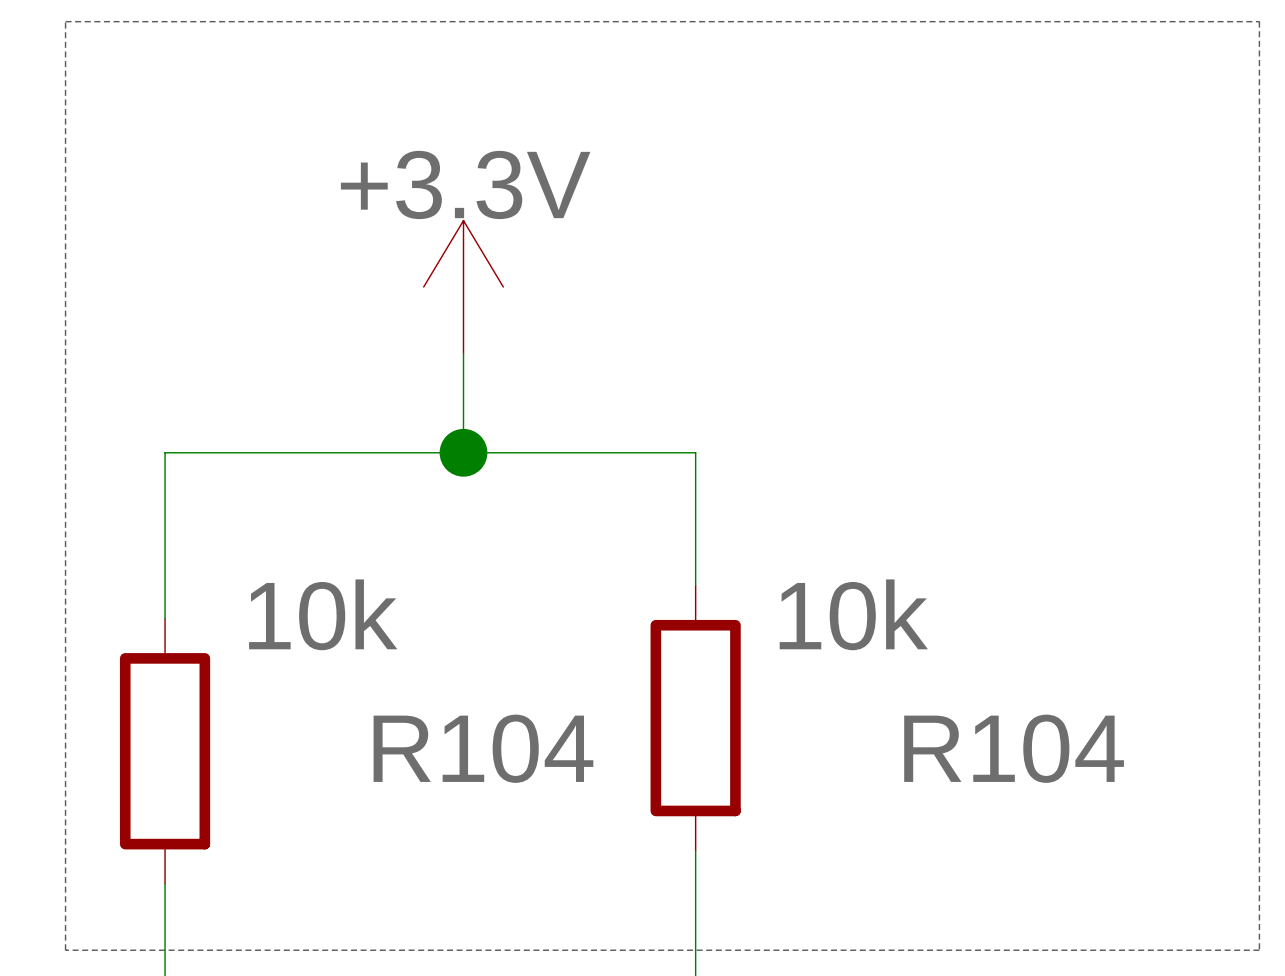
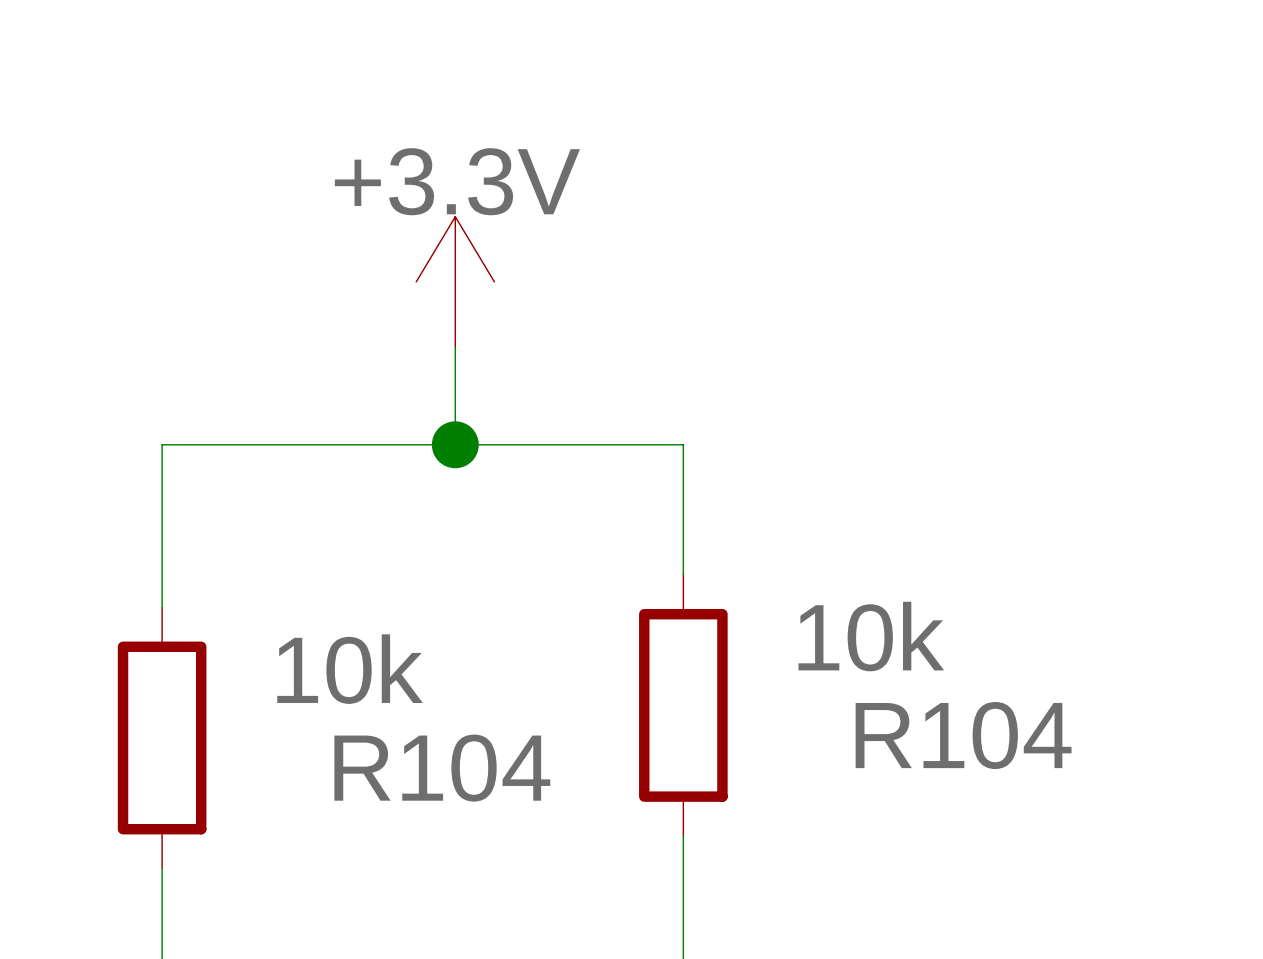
line: (65, 21) (1259, 21) (1259, 950) (65, 950) (65, 21) -> none
R104 value position: 10k (323, 614) -> 10k (350, 669)
R104 value position: 10k (853, 614) -> 10k (871, 636)
R104 name position: R104 (483, 748) -> R104 (442, 768)
R104 name position: R104 (1014, 748) -> R104 (963, 735)

